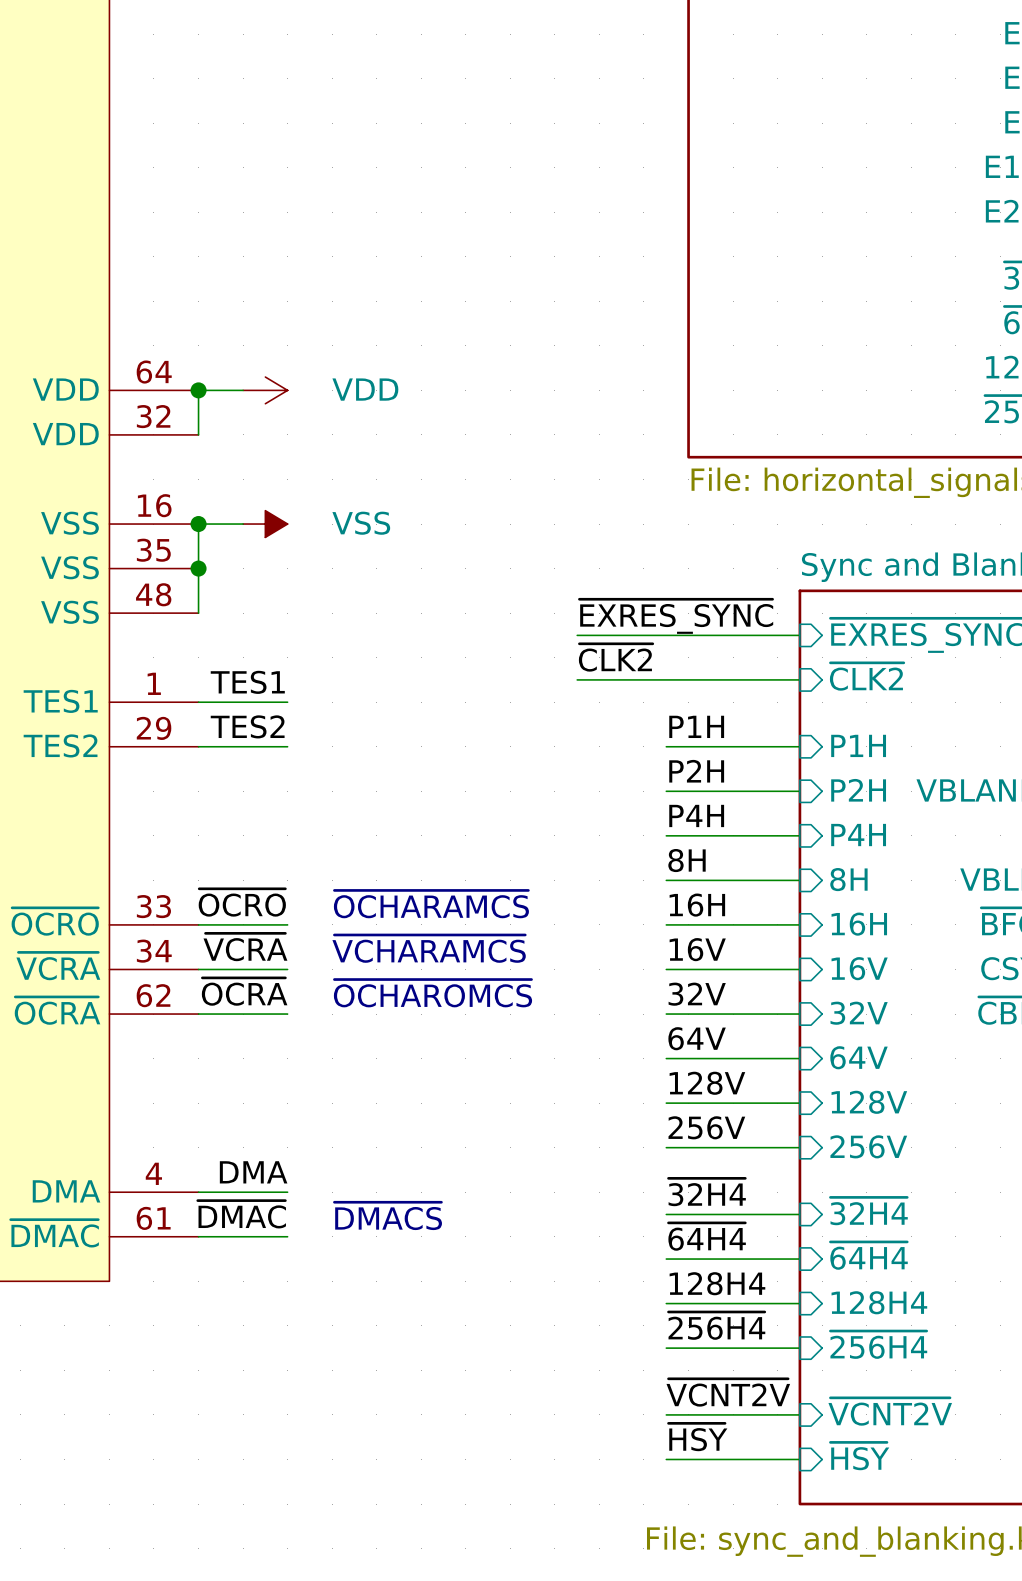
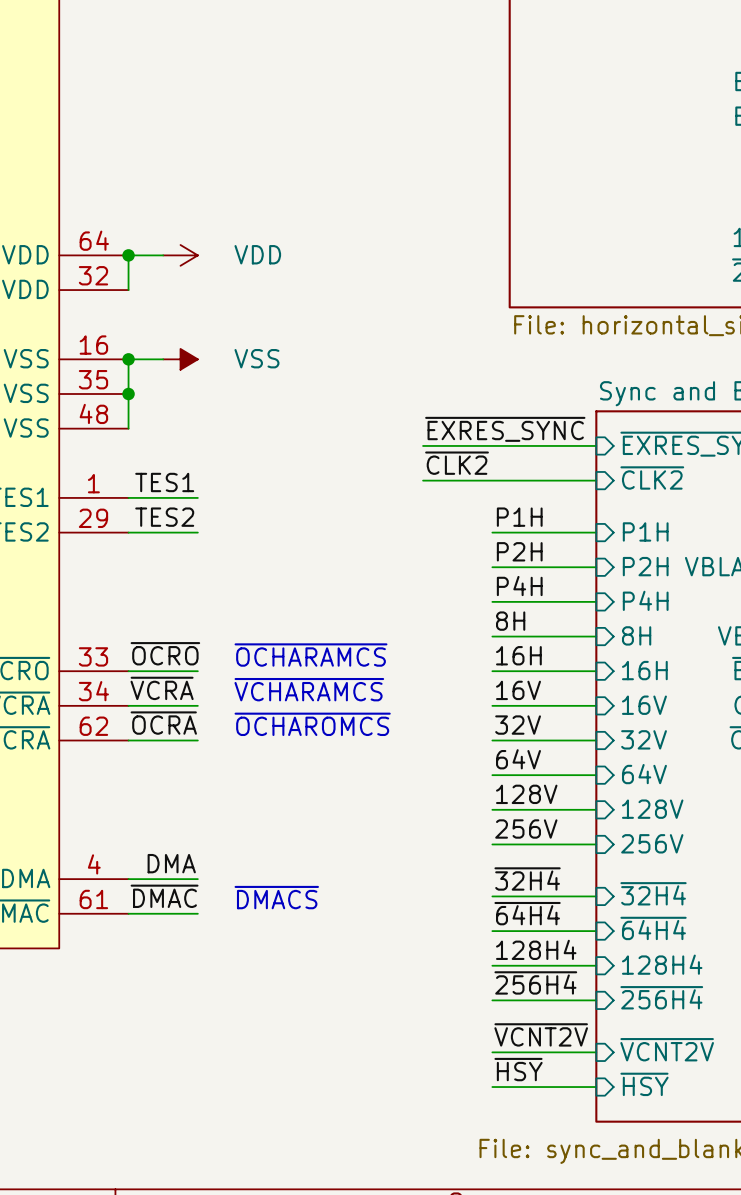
label position: ~{OCRO} (242, 902) -> ~{OCRO} (165, 653)
label position: ~{VCRA} (245, 947) -> ~{VCRA} (162, 688)
label position: ~{OCRA} (244, 991) -> ~{OCRA} (163, 723)
label position: ~{DMAC} (241, 1214) -> ~{DMAC} (164, 896)

